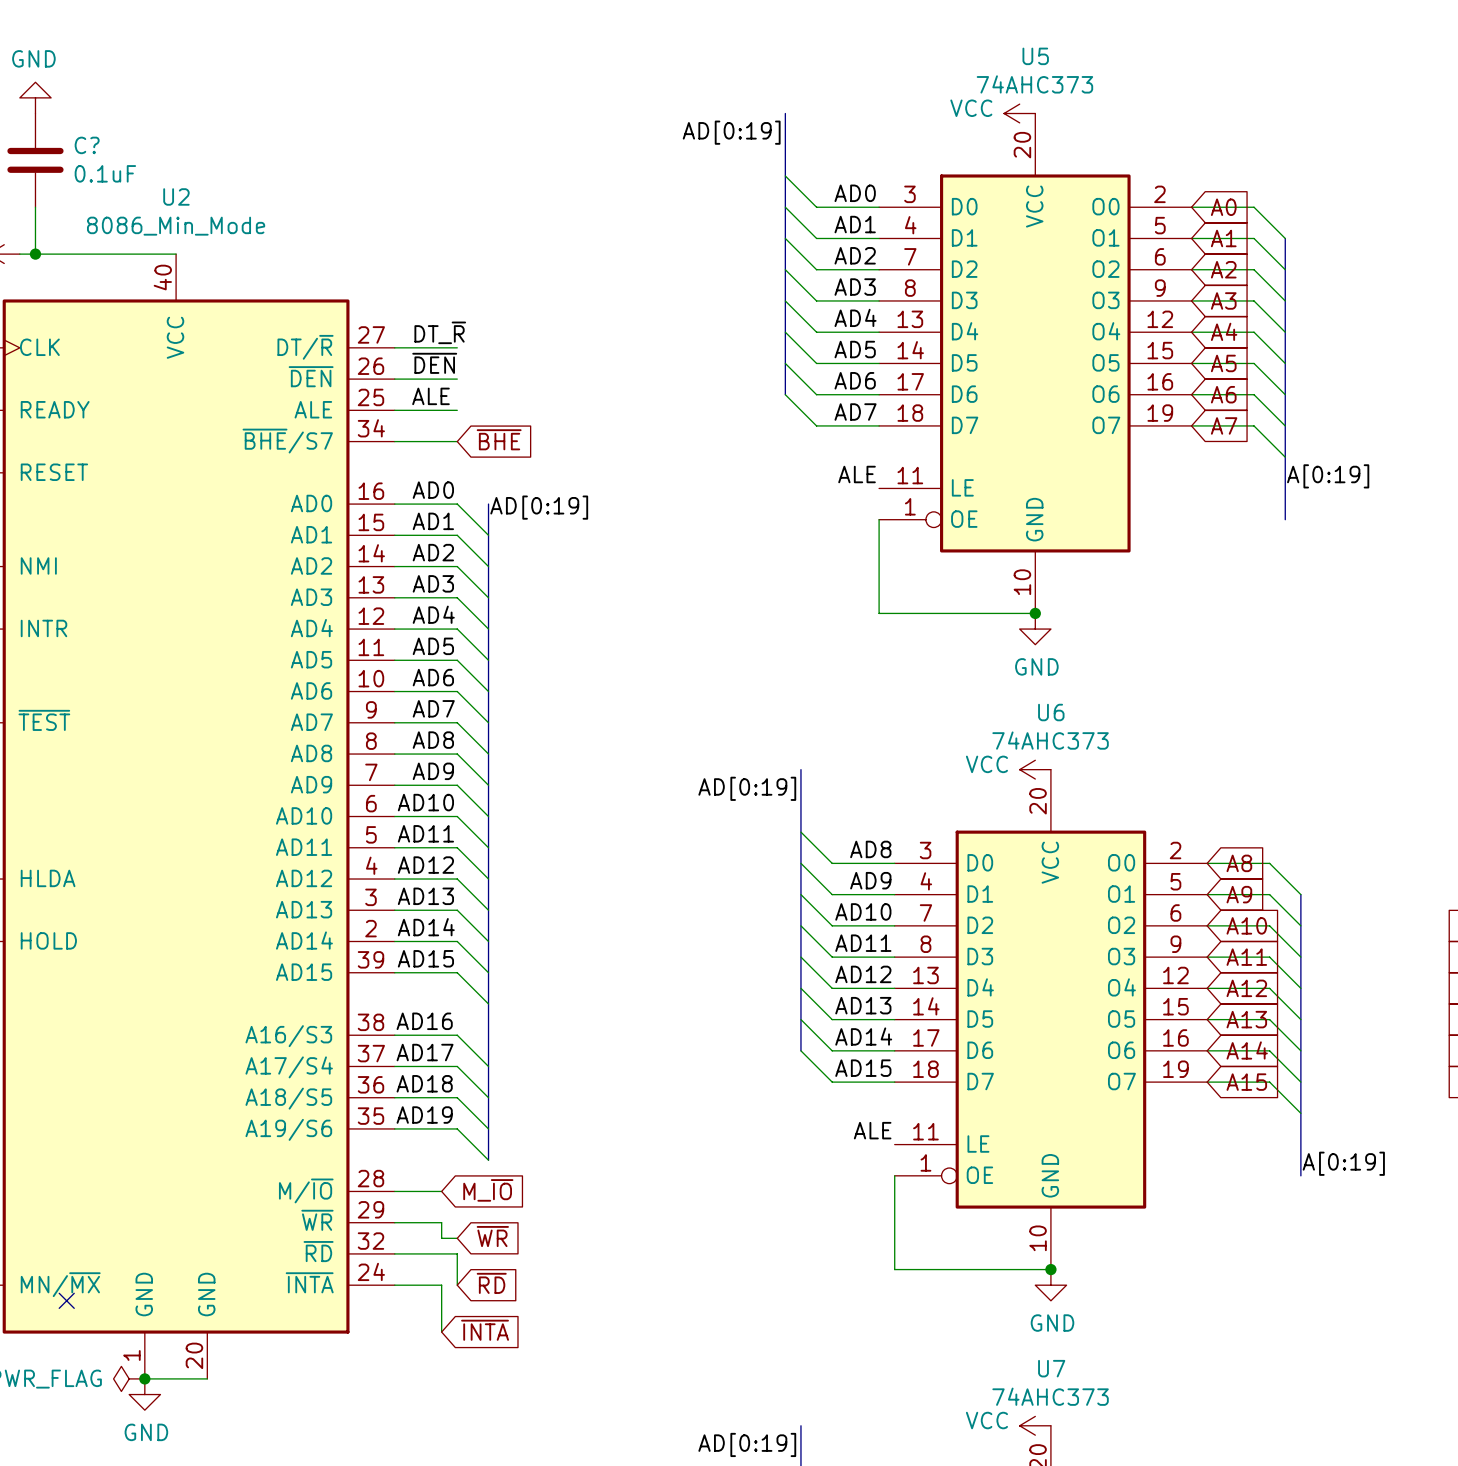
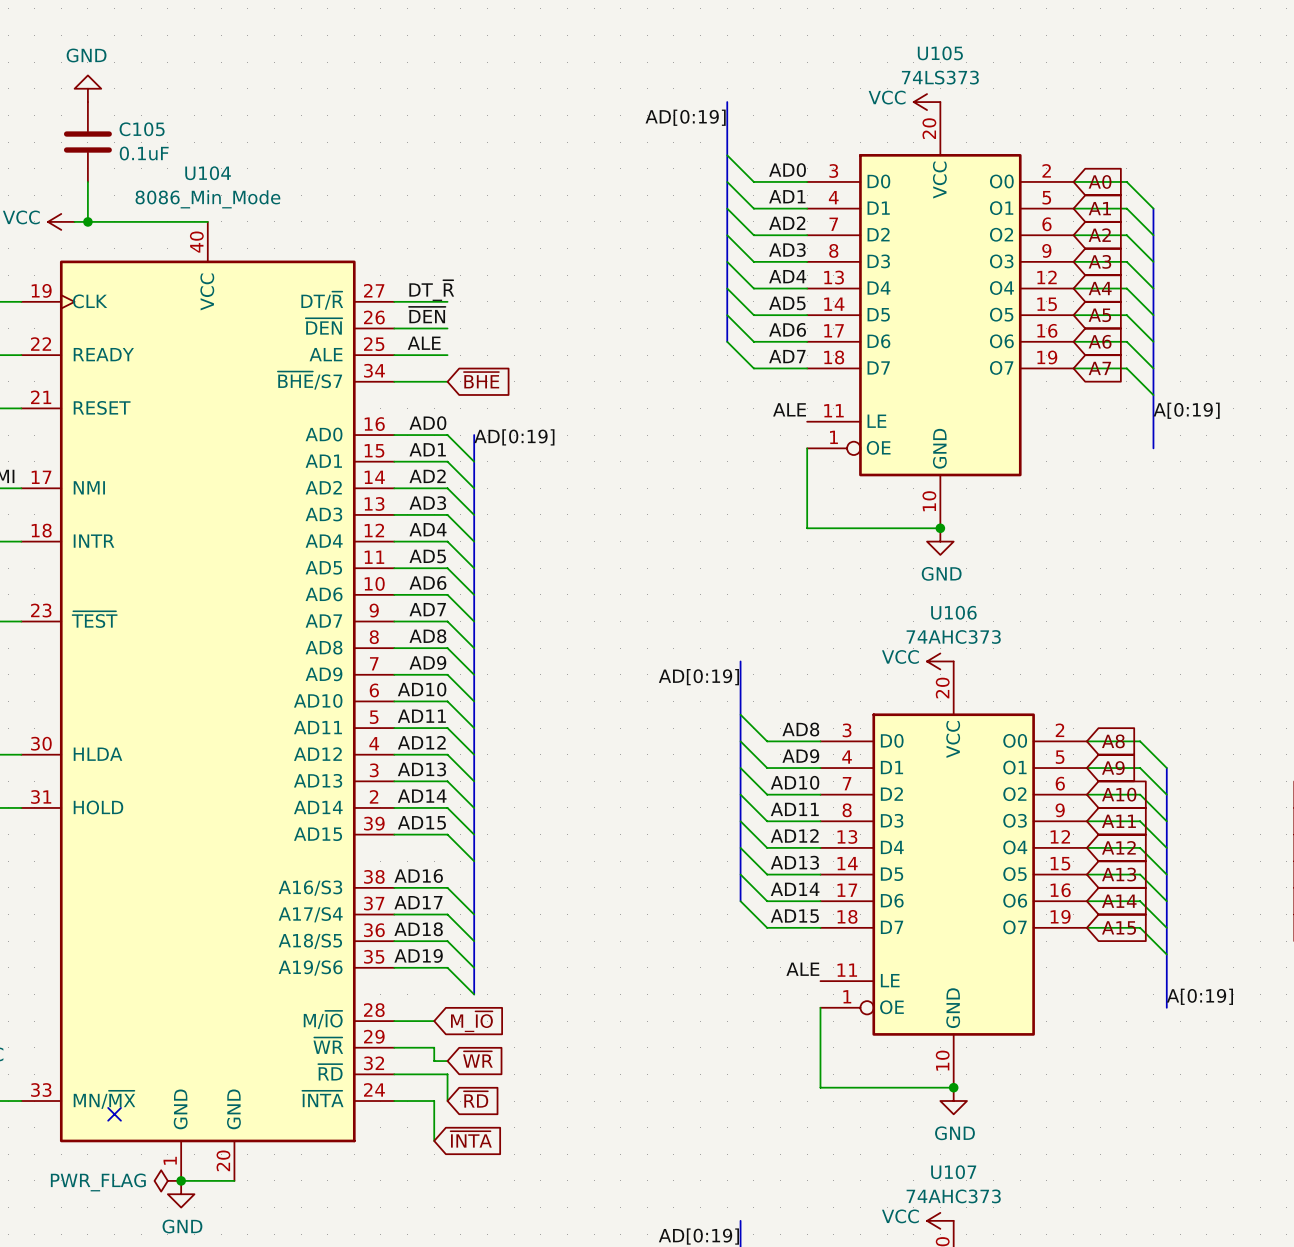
U5 name: U5 (1035, 56) -> U105 (940, 53)
U5 value: 74AHC373 (1034, 84) -> 74LS373 (940, 77)
C? name: C? (87, 145) -> C105 (142, 129)
U2 name: U2 (176, 196) -> U104 (208, 173)
U6 name: U6 (1051, 712) -> U106 (953, 612)
U7 name: U7 (1051, 1368) -> U107 (953, 1172)

